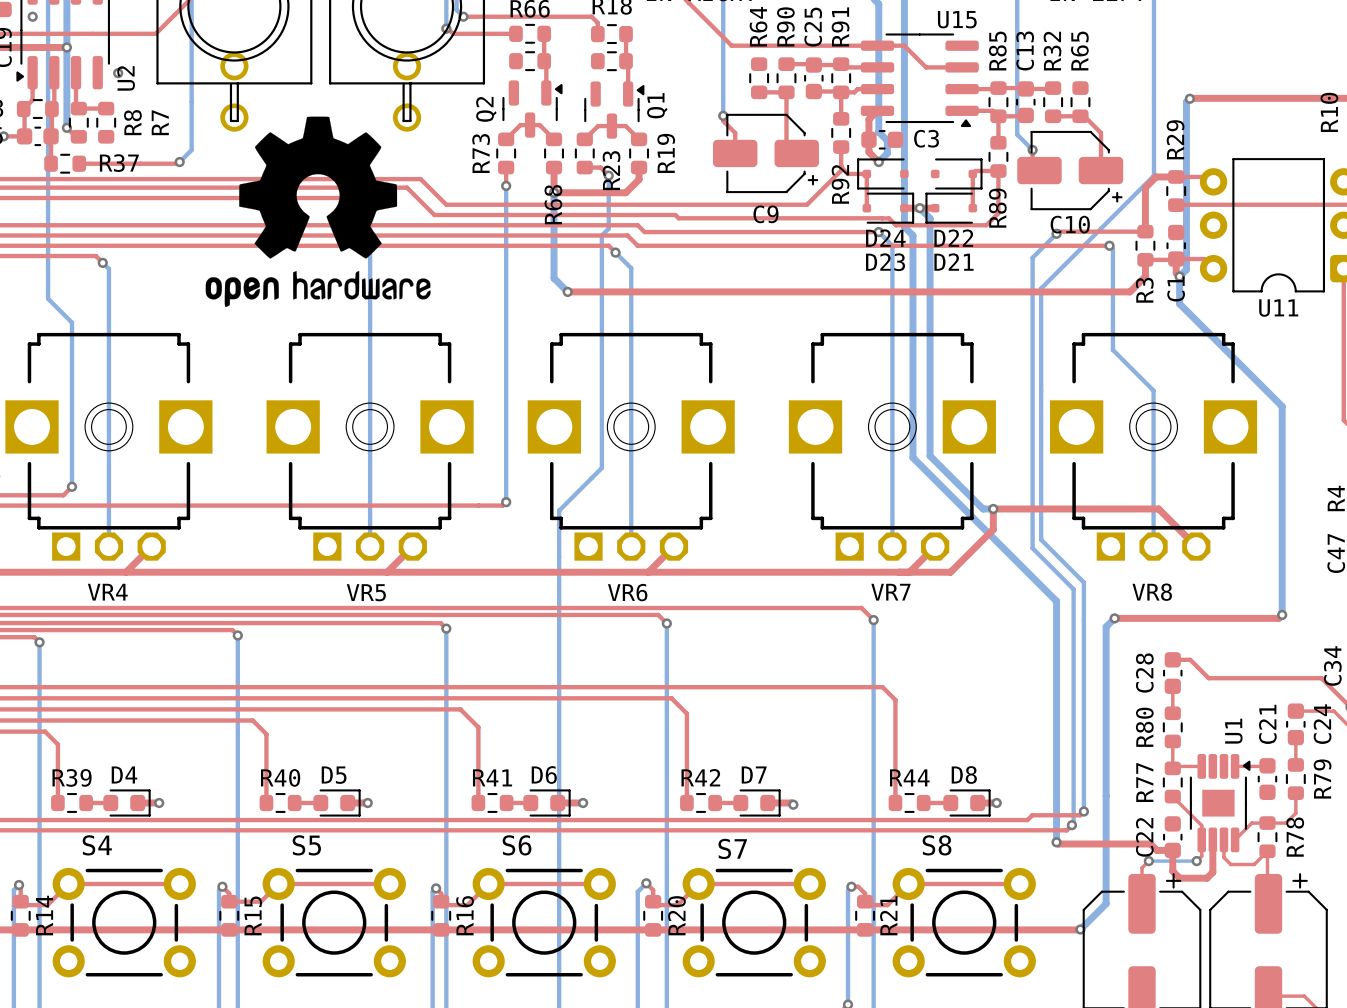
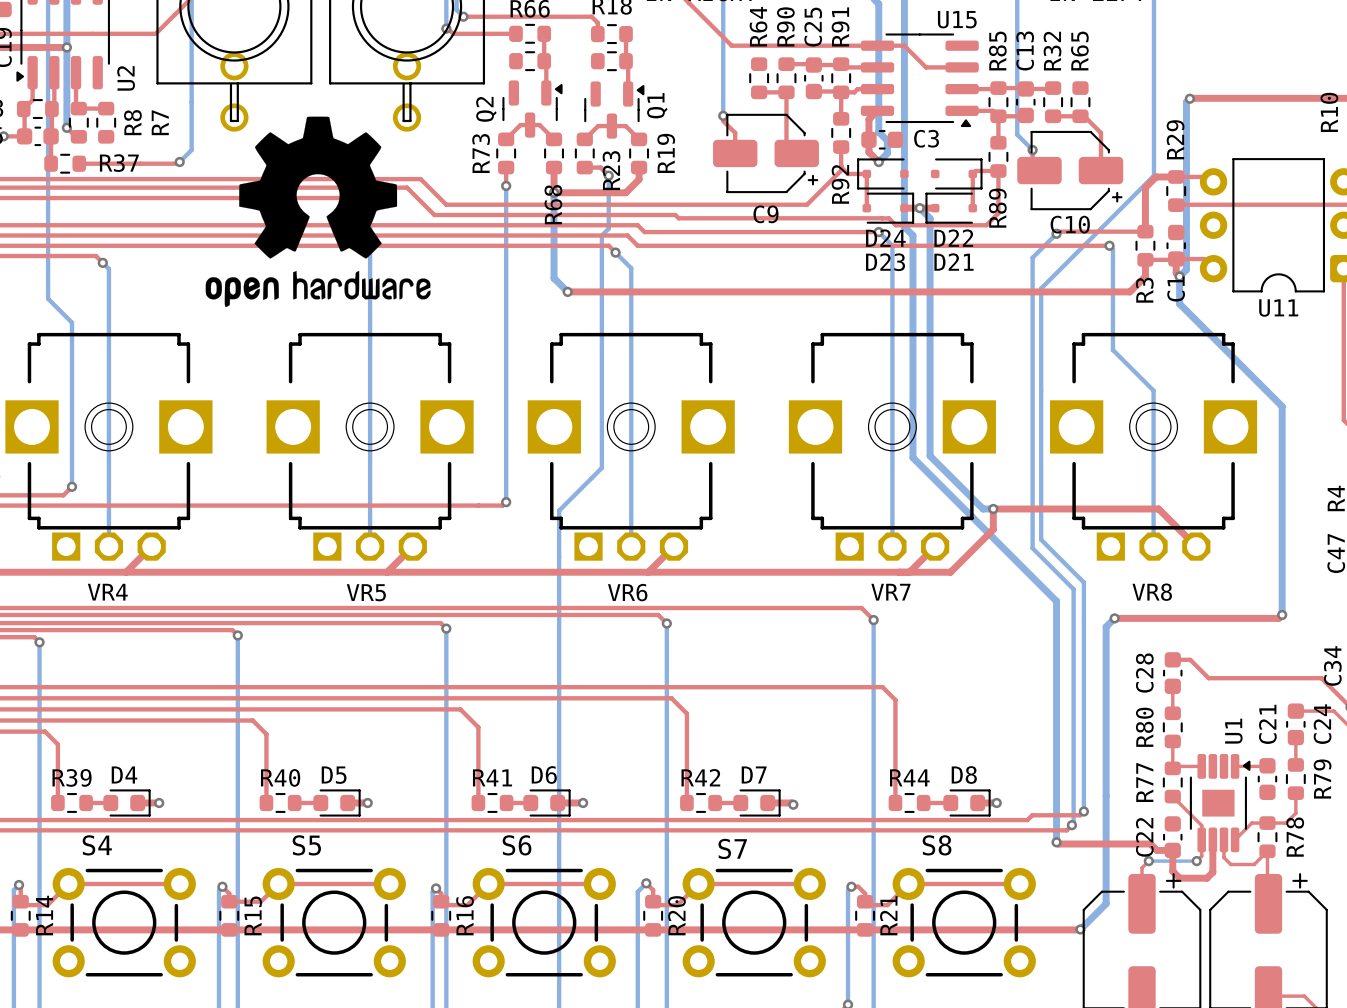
via: (32, 16) -> none
via: (118, 73) -> none

